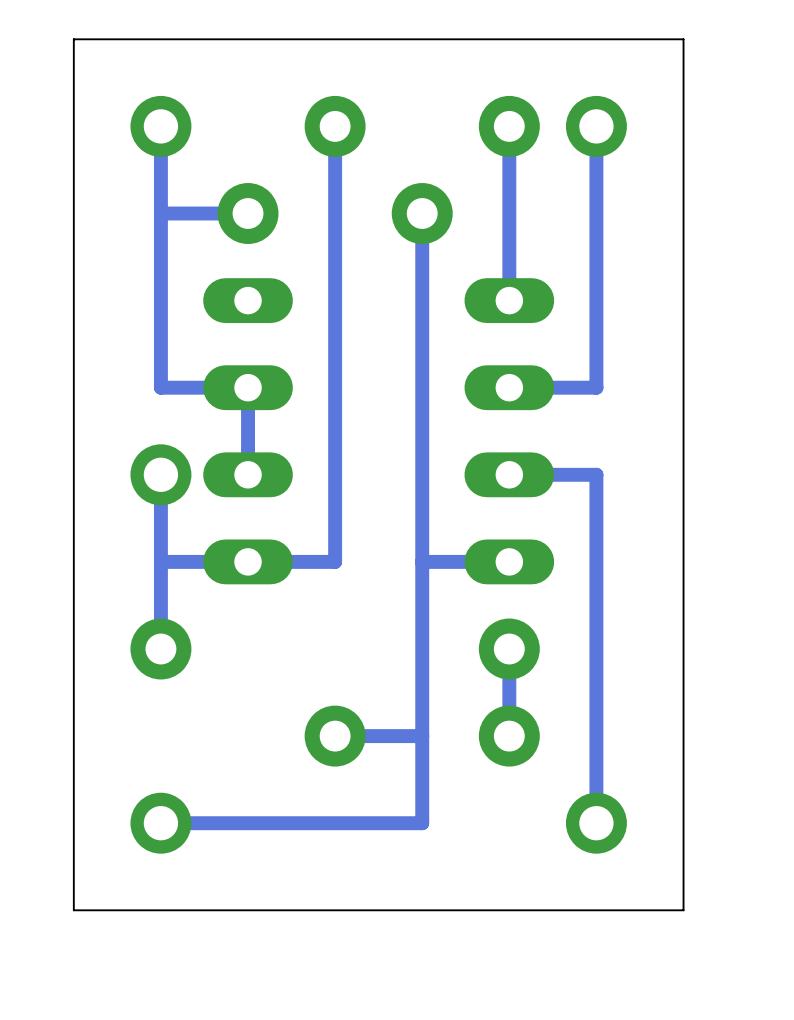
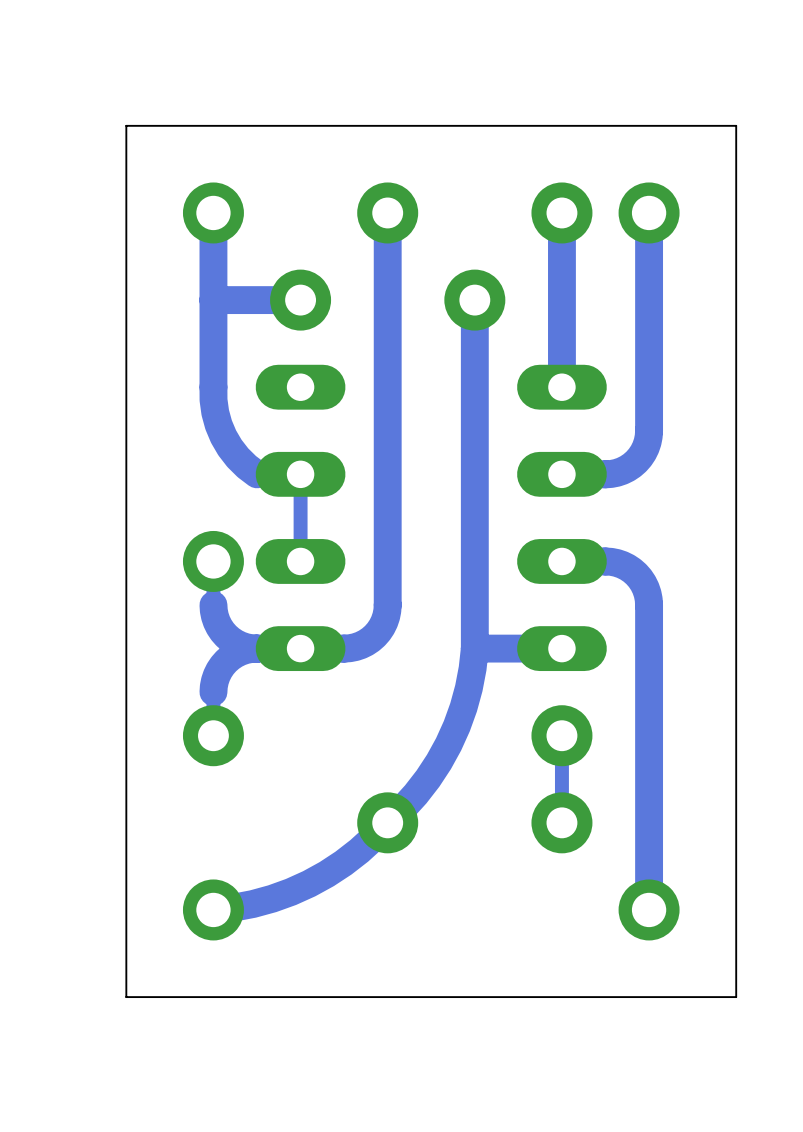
bottom track width: thin (160, 126) (160, 300) -> thick (213, 212) (213, 387)
bottom track width: thin (335, 126) (335, 518) -> thick (387, 212) (387, 605)
bottom track width: thin (509, 126) (509, 300) -> thick (561, 212) (561, 387)
bottom track width: thin (596, 126) (596, 344) -> thick (649, 212) (649, 430)
bottom track width: thin (248, 213) (160, 213) -> thick (300, 300) (213, 300)
bottom track width: thin (422, 213) (422, 561) (509, 561) -> thick (474, 300) (474, 648) (561, 648)
bottom track: (160, 300) (160, 387) (204, 387) -> (213, 387) (215, 412) (223, 436) (237, 457) (257, 474)
bottom track: (596, 344) (596, 387) (552, 387) -> (649, 430) (645, 447) (636, 461) (622, 471) (605, 474)
bottom track: (552, 474) (596, 474) (596, 518) -> (605, 561) (622, 564) (636, 574) (645, 588) (649, 605)
bottom track: (160, 518) (160, 605) -> (213, 605) (216, 621) (226, 635) (240, 645) (257, 648) (240, 651) (226, 661) (216, 675) (213, 692)
bottom track: (335, 518) (335, 561) (291, 561) -> (387, 605) (384, 621) (374, 635) (360, 645) (344, 648)
bottom track width: thin (596, 518) (596, 823) -> thick (649, 605) (649, 909)
bottom track: (204, 561) (160, 561) -> none
bottom track: (422, 561) (422, 823) (160, 823) -> (474, 648) (468, 688) (456, 726) (448, 744) (438, 761) (415, 794) (374, 837) (359, 850) (326, 874) (291, 891) (252, 904) (213, 909)
bottom track: (422, 736) (335, 736) -> none

